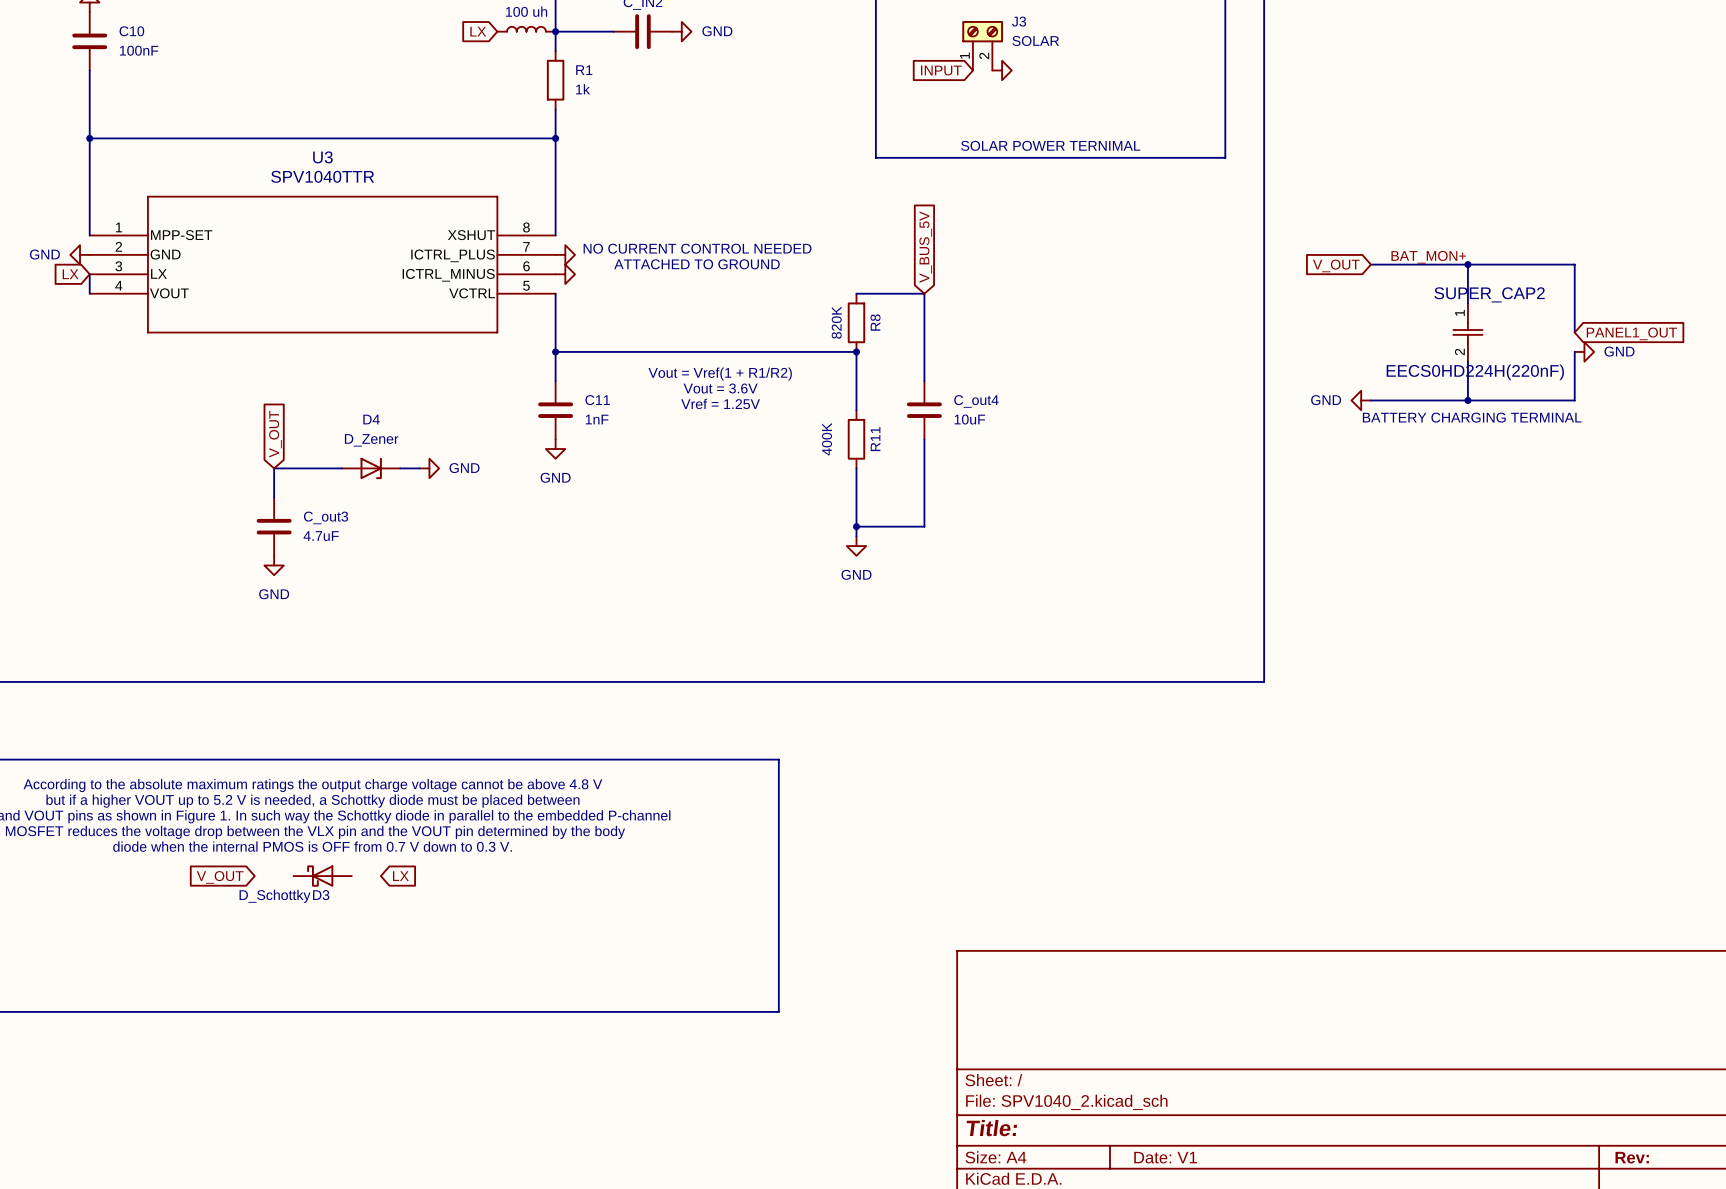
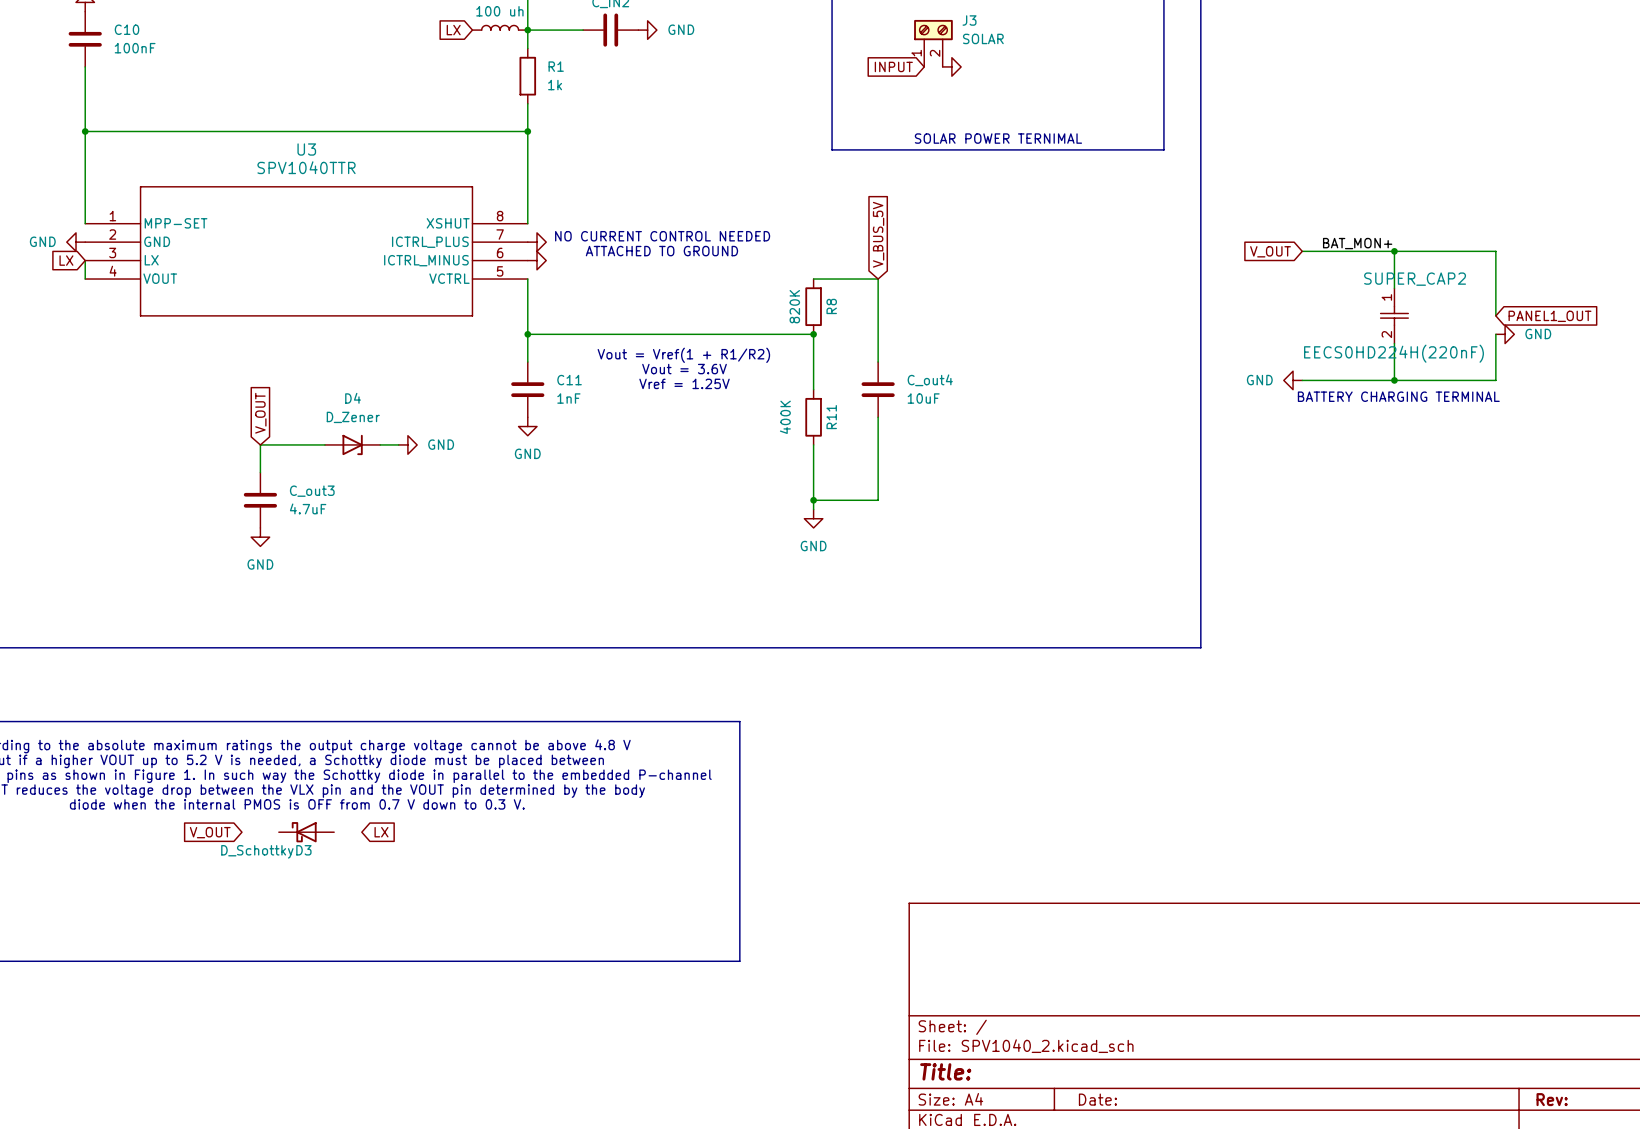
title block: Date: V1 (1165, 1157) -> Date: (1097, 1099)

